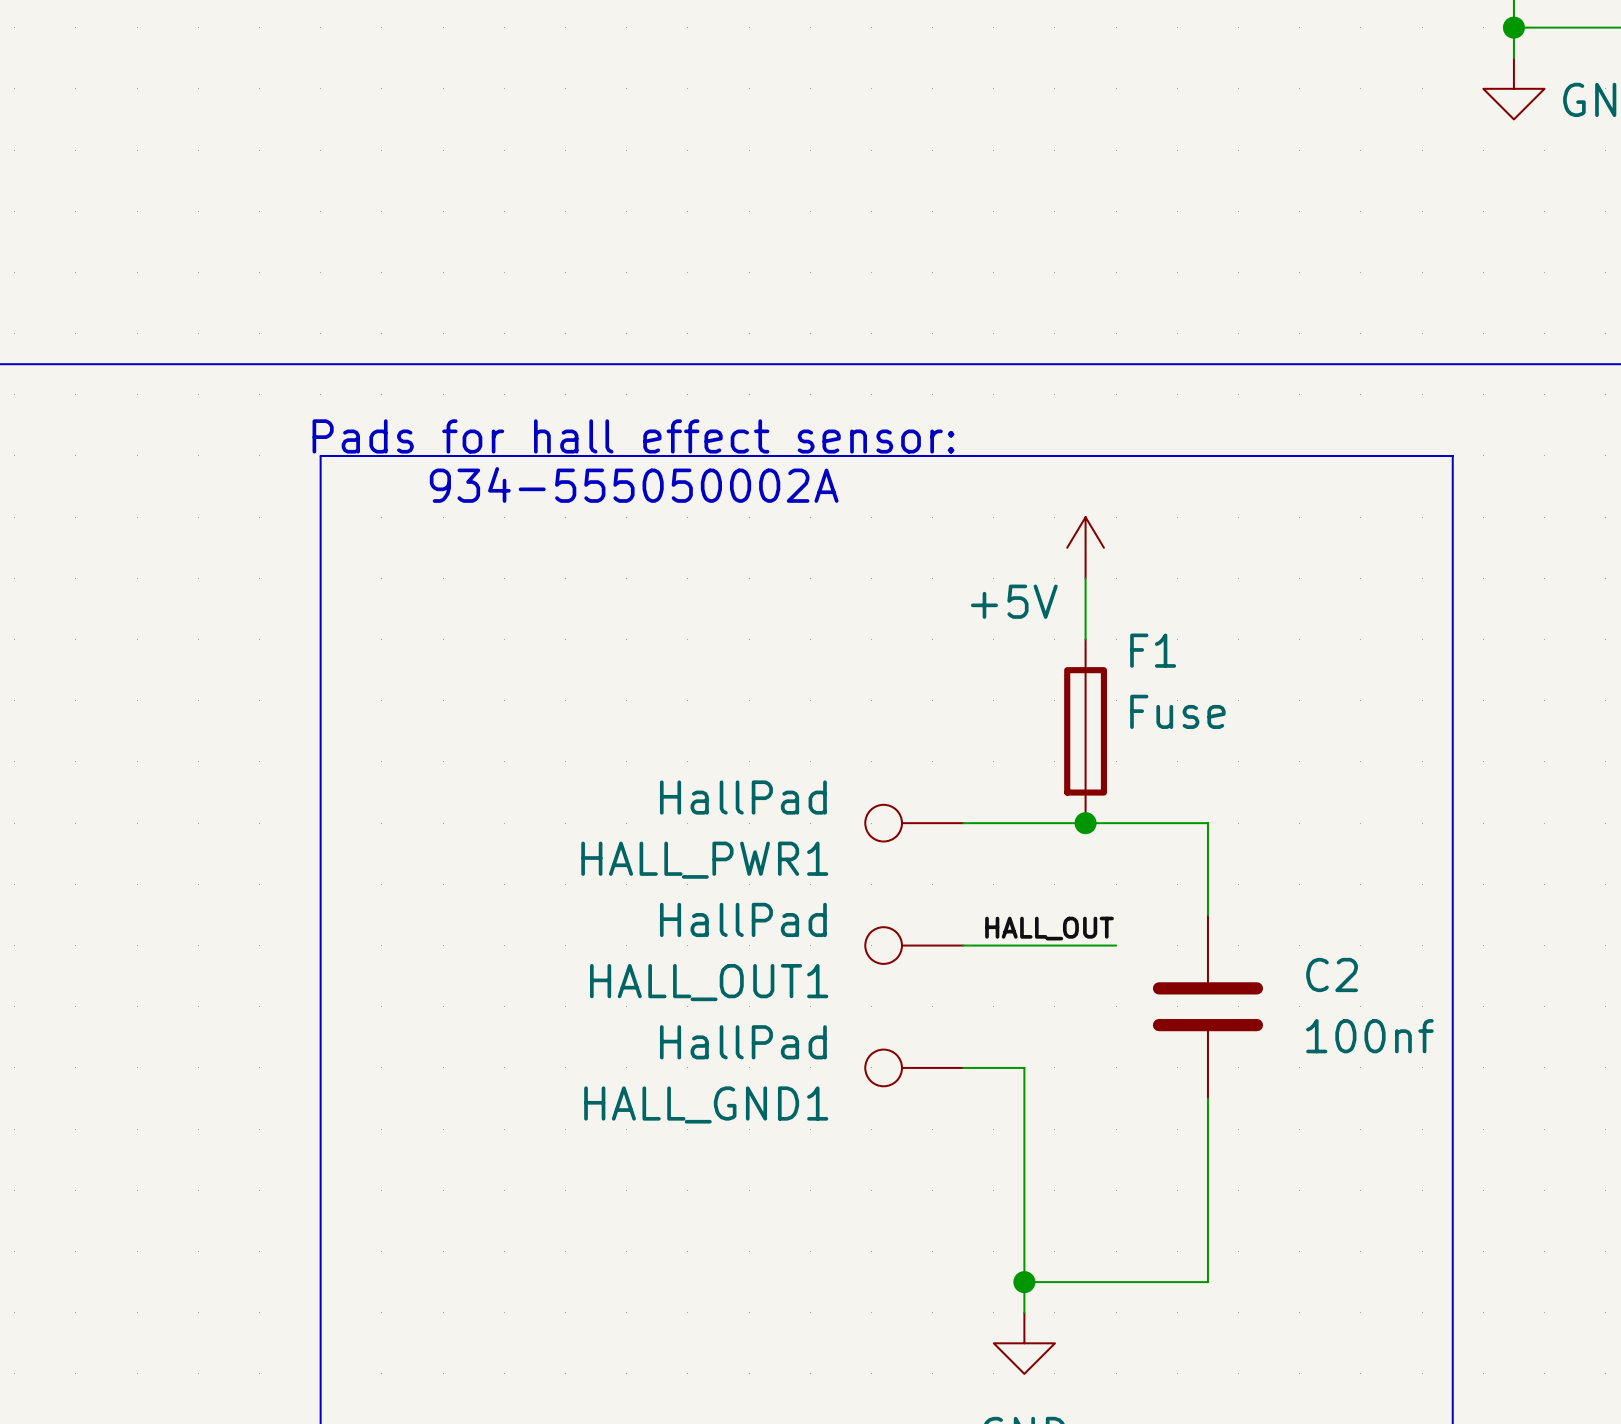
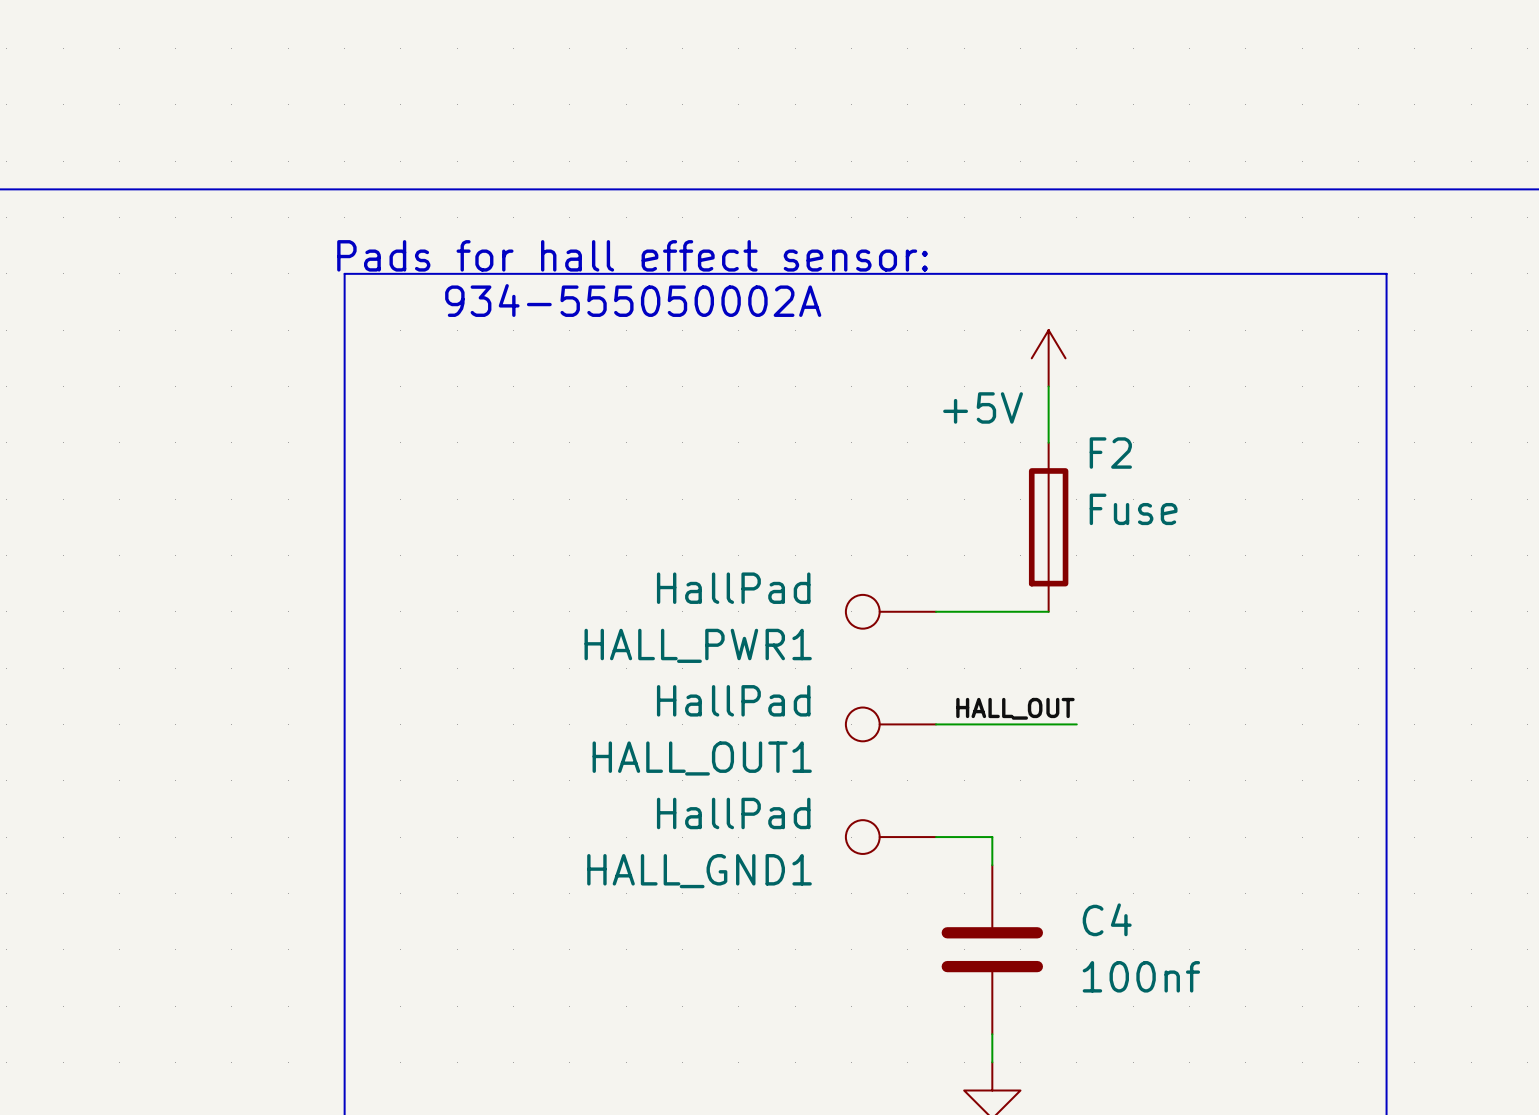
F1 name: F1 (1153, 650) -> F2 (1110, 453)
wire: (1085, 823) (1207, 823) (1207, 914) -> none
junction: (1085, 823) -> none
C2: 100nf (1207, 1006) -> none
wire: (1024, 1098) (1024, 1282) (1207, 1282) (1207, 1098) -> none
C4: none -> 100nf (992, 949)
junction: (1024, 1282) -> none

